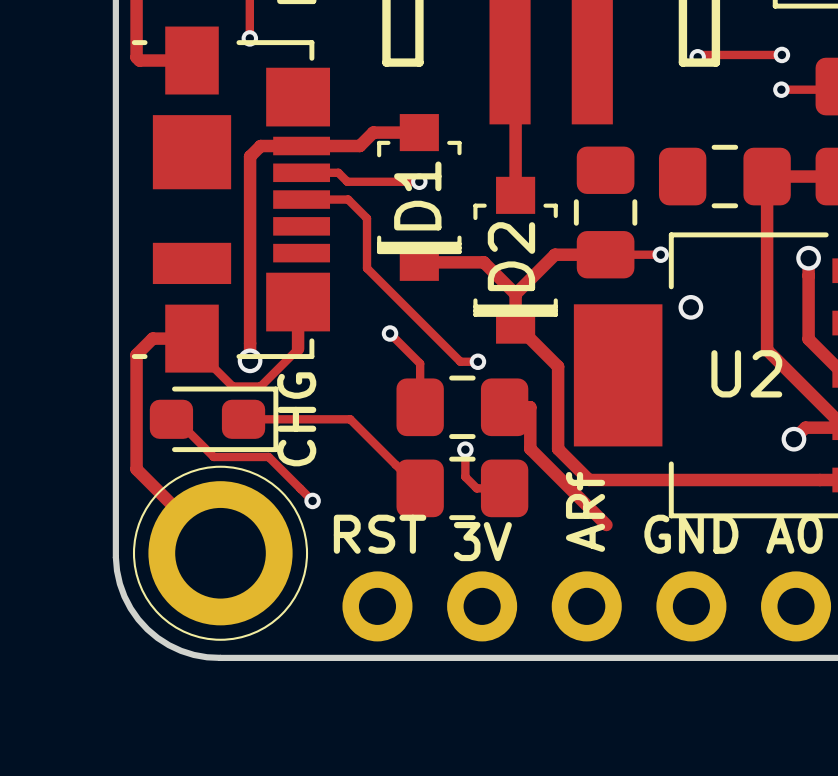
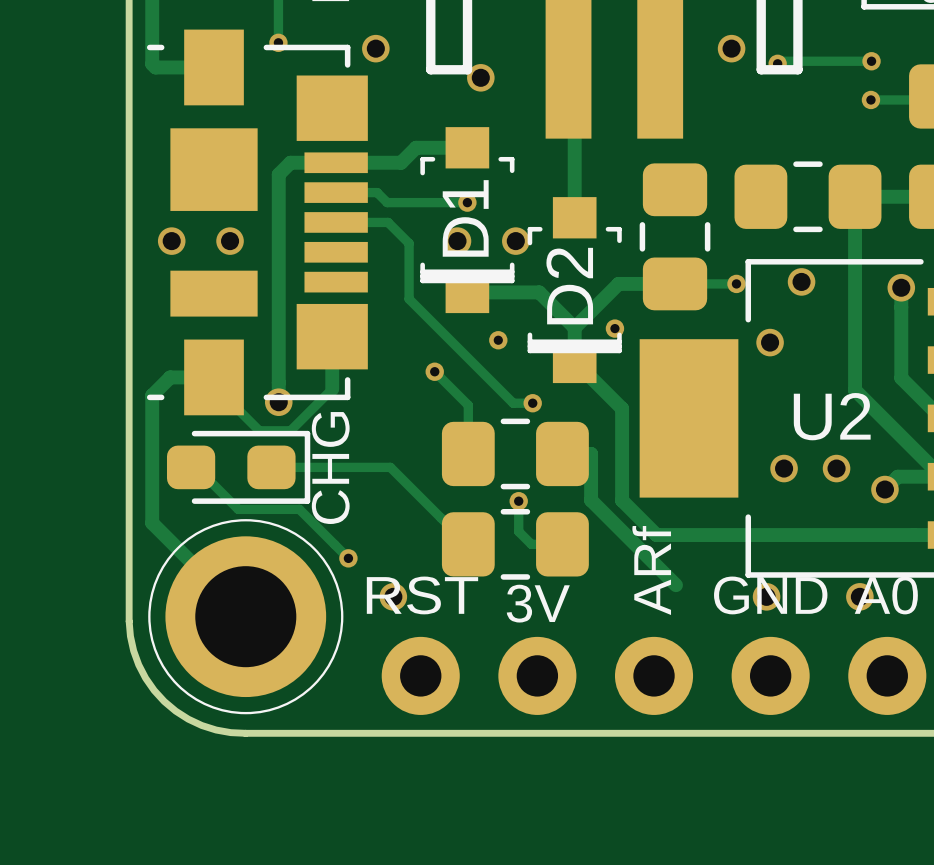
via: none -> (375, 48)
via: none -> (731, 48)
via: none -> (480, 77)
via: none -> (171, 241)
via: none -> (230, 241)
via: none -> (457, 241)
via: none -> (515, 241)
via: none -> (801, 281)
via: none -> (614, 328)
via: none -> (498, 340)
via: none -> (784, 468)
via: none -> (836, 468)
via: none -> (393, 596)
via: none -> (766, 596)
via: none -> (859, 596)

